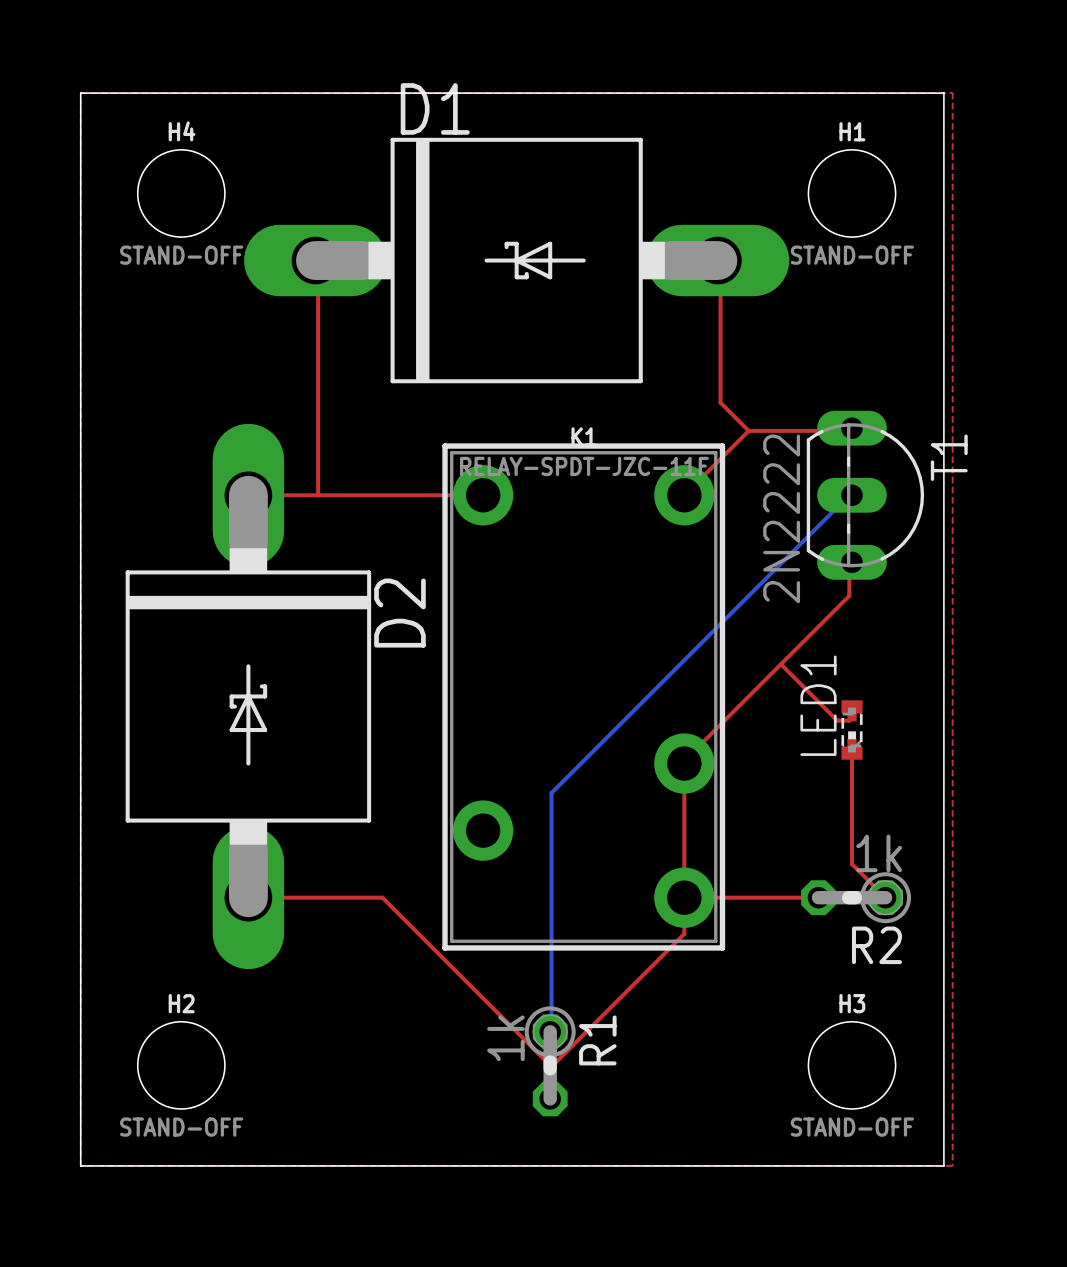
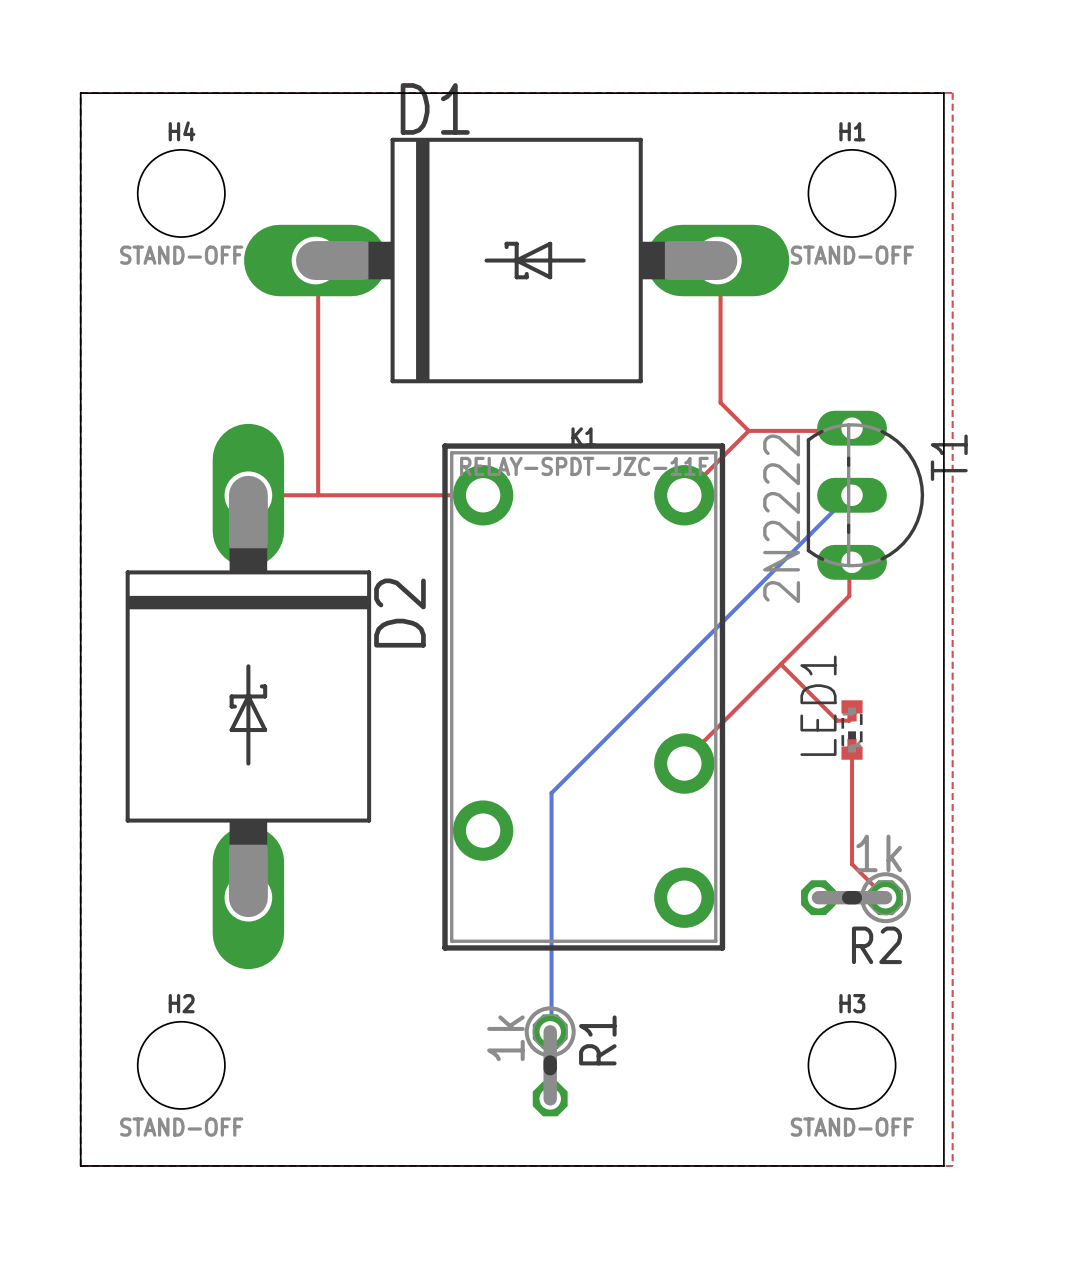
top track: (684, 763) (684, 933) (551, 1066) -> none
top track: (248, 897) (382, 897) (551, 1066) -> none
top track: (684, 897) (818, 897) -> none

